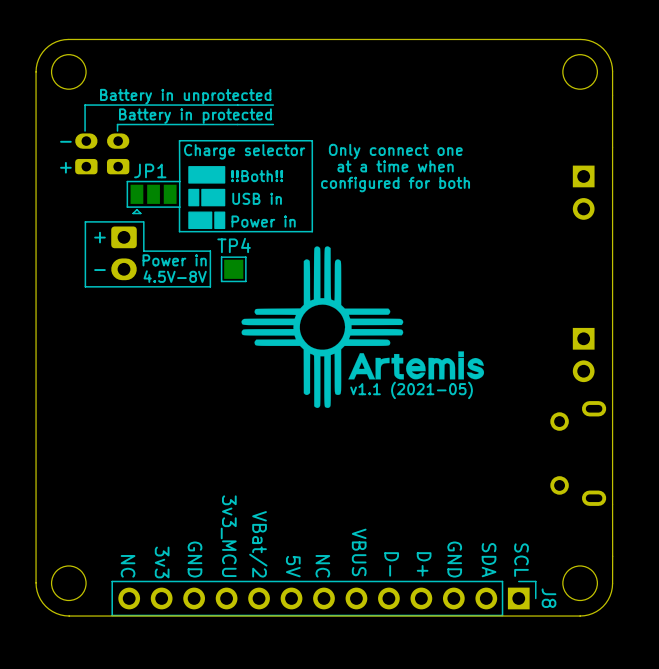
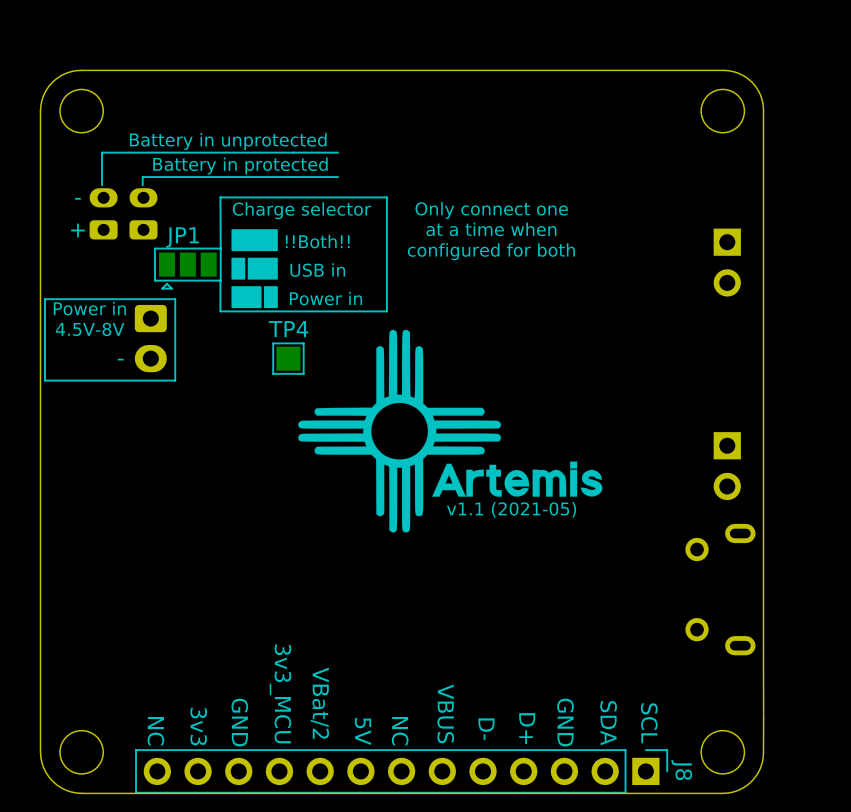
line: (85, 221) (85, 286) -> (102, 299) (44, 299) (44, 380) (102, 380)
line: (143, 221) (143, 251) (210, 251) (210, 286) (143, 286) -> (175, 299) (175, 380)
text: + (99, 237) -> none
text position: Power in (174, 260) -> Power in (89, 308)
text position: 4.5V-8V (175, 276) -> 4.5V-8V (90, 329)

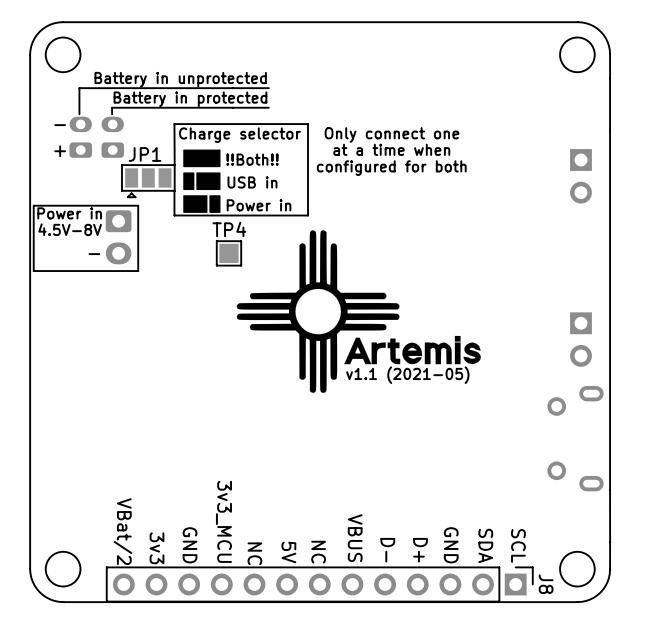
text position: VBat/2 (319, 703) -> VBat/2 (123, 531)
text position: NC (155, 731) -> NC (254, 553)

